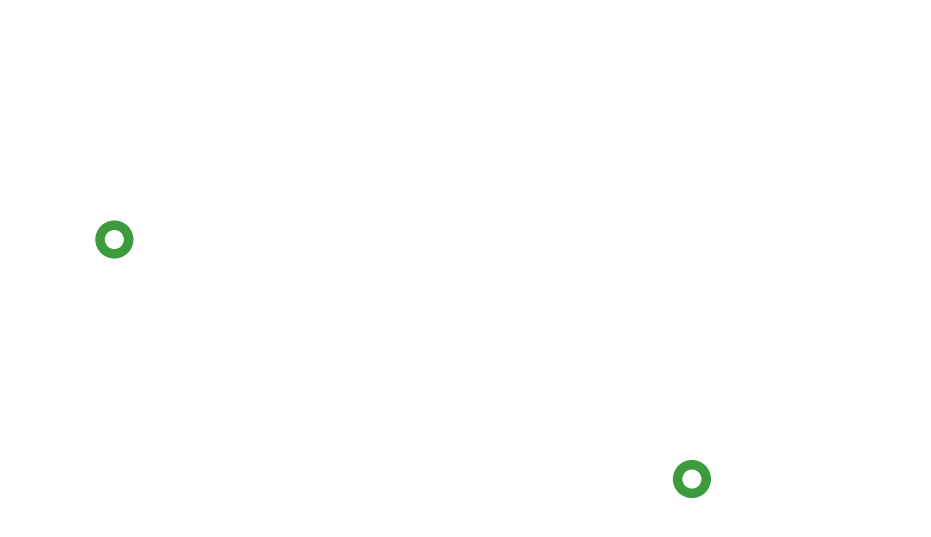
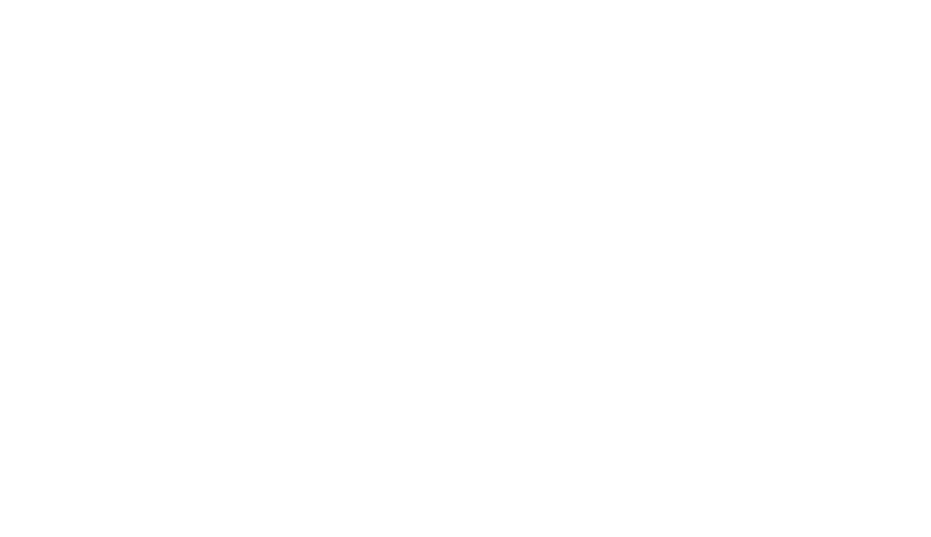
via: (114, 239) -> none
via: (691, 479) -> none

